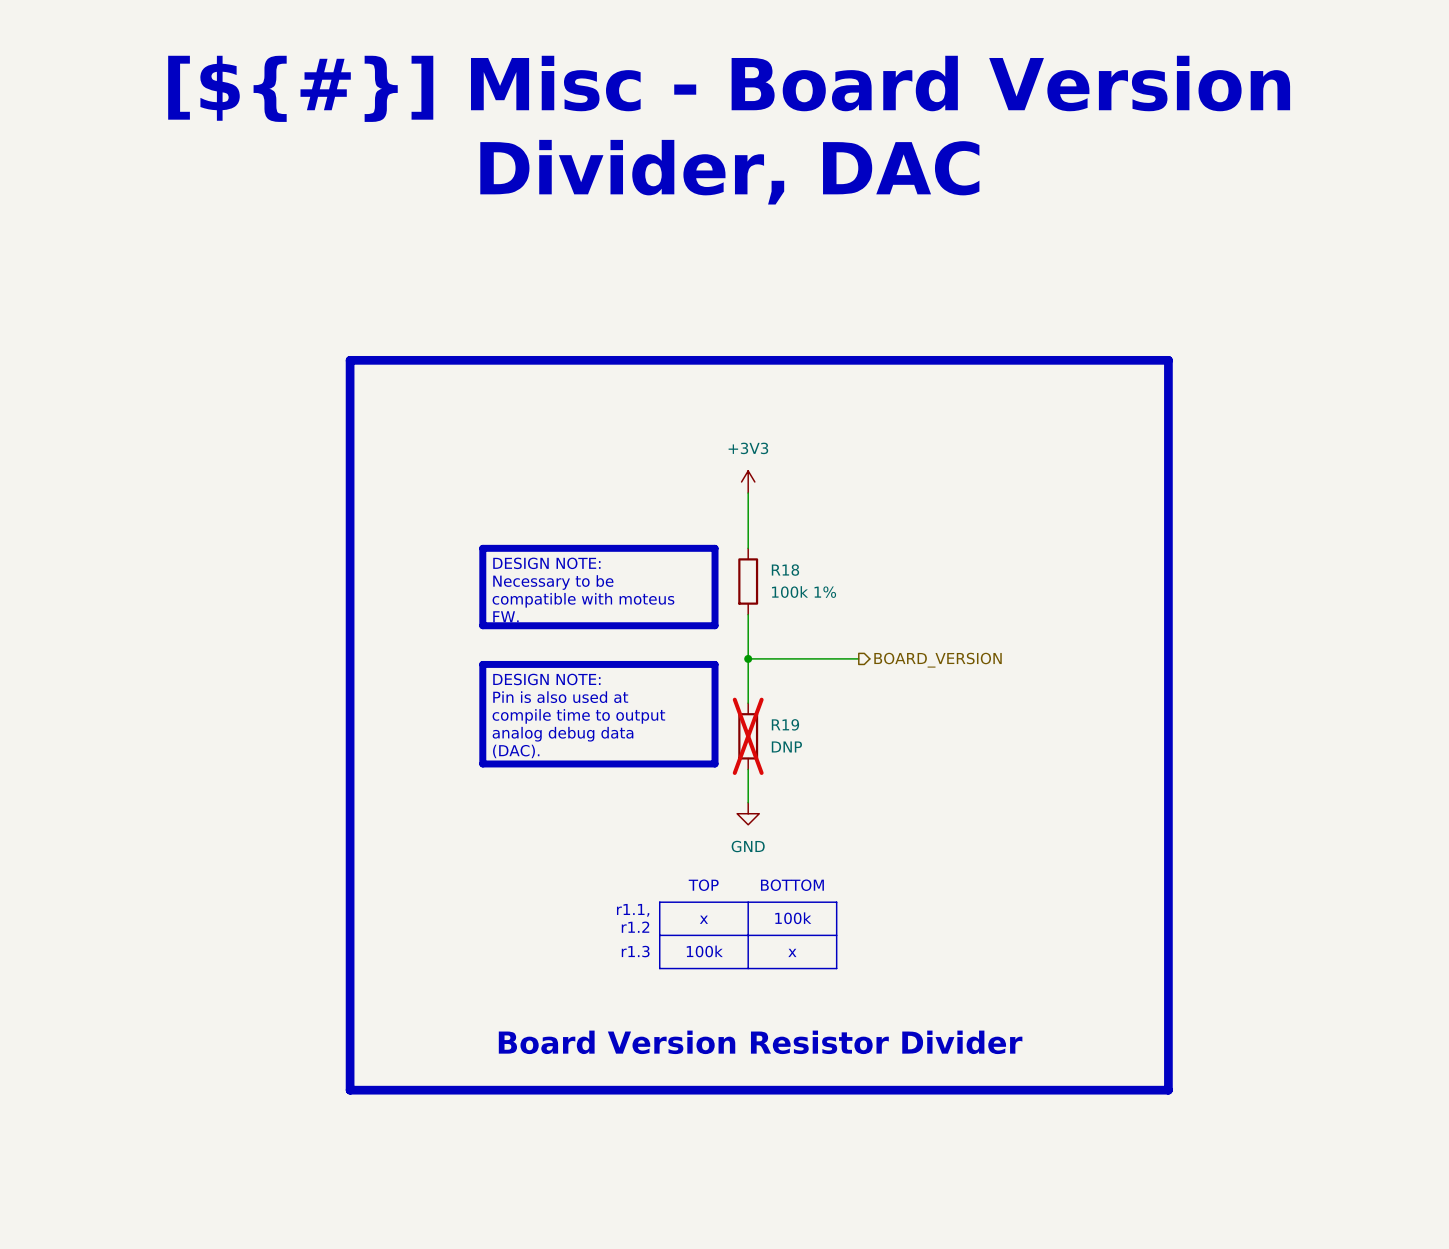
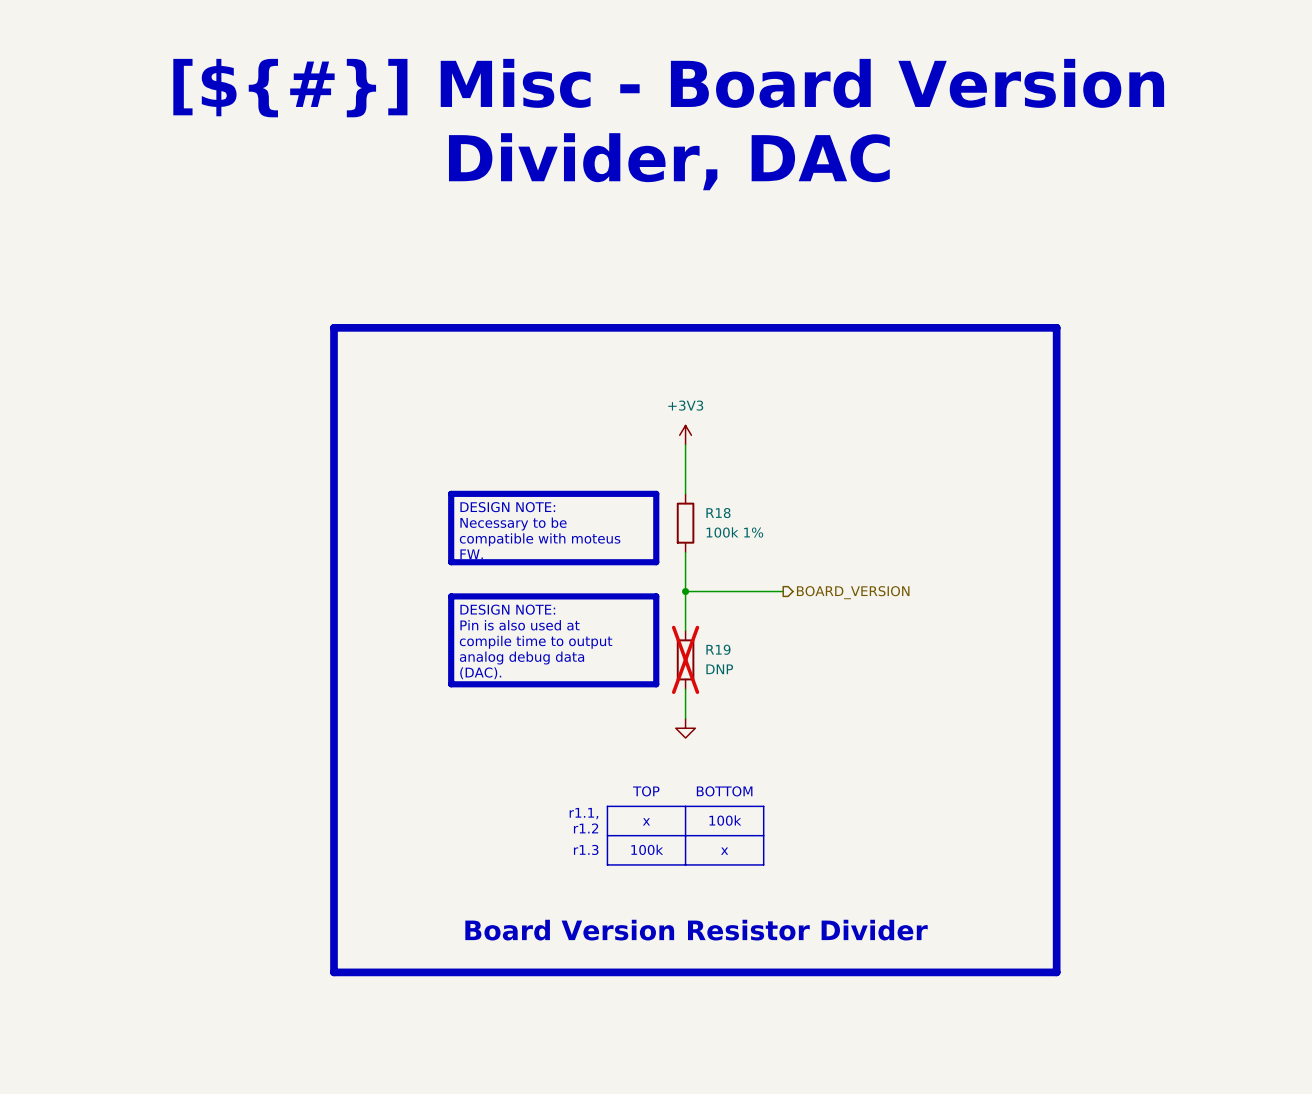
power symbol text: GND (748, 846) -> none

